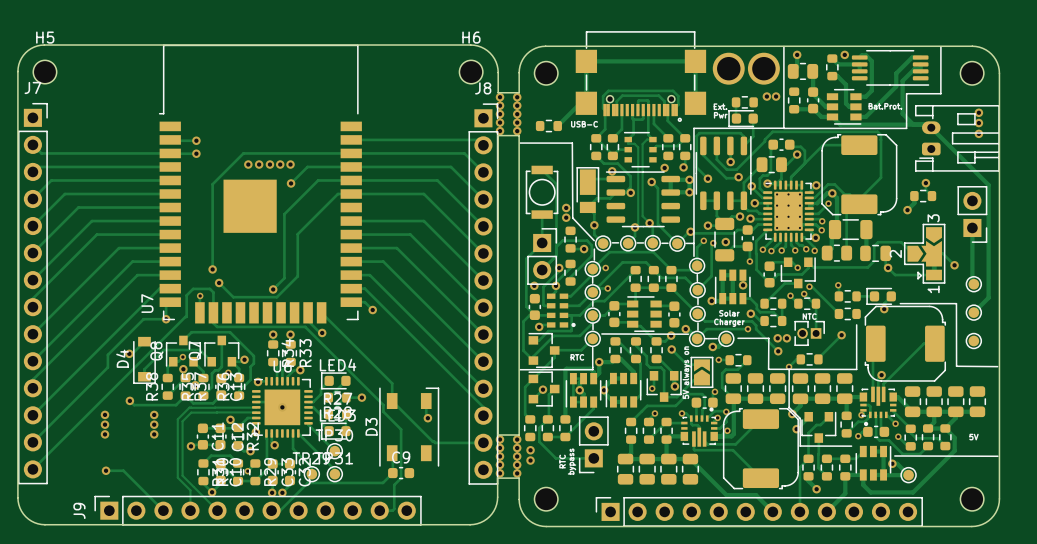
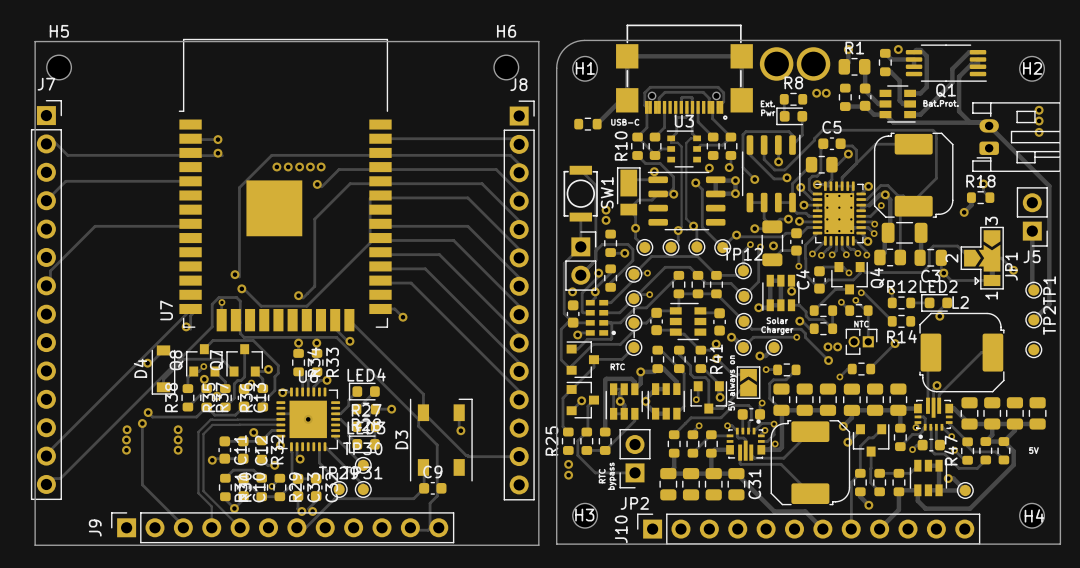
line: (783, 46) (783, 128) (906, 128) (906, 93) (940, 93) (940, 47) -> none
board edge: (972, 46) (982, 48) (991, 54) (997, 62) (999, 73) (999, 498) (995, 512) (982, 524) (971, 526) (542, 526) (529, 520) (521, 509) (519, 478) (497, 478) (497, 500) (493, 510) (483, 521) (473, 524) (44, 524) (31, 521) (23, 514) (17, 497) (17, 71) (21, 58) (28, 50) (44, 45) (474, 45) (487, 50) (494, 58) (497, 68) (498, 92) (519, 92) -> (1032, 40) (1060, 40) (1060, 544) (556, 544) (556, 89)
board edge: none -> (35, 41) (35, 545) (538, 545) (538, 41) (35, 41)
R1 name: none -> R1 (854, 47)
H1 name: none -> H1 (585, 68)
H2 name: none -> H2 (1032, 68)
R8 name: none -> R8 (793, 82)
Q1 name: none -> Q1 (946, 90)
via: (500, 97) -> none
via: (517, 97) -> none
via: (500, 105) -> none
via: (517, 105) -> none
via: (500, 114) -> none
via: (517, 114) -> none
via: (500, 122) -> none
via: (517, 122) -> none
U3 name: none -> U3 (684, 121)
line: (784, 128) (693, 128) (693, 256) -> none
C5 name: none -> C5 (831, 127)
via: (500, 131) -> none
via: (517, 131) -> none
board edge: (498, 135) (498, 435) (519, 435) (519, 135) (498, 135) -> none
track: none -> (50, 138) (67, 155) (222, 155)
line: (520, 143) (572, 143) (572, 218) (594, 240) -> none
track: (32, 144) (41, 153) (196, 153) -> none
R10 name: none -> R10 (621, 146)
via: (248, 164) -> none
via: (259, 164) -> none
via: (269, 164) -> none
via: (280, 164) -> none
via: (290, 164) -> none
track: (170, 166) (37, 166) (32, 171) -> none
via: none -> (276, 166)
via: none -> (288, 166)
via: none -> (299, 166)
via: none -> (310, 166)
via: none -> (321, 166)
track: none -> (523, 168) (510, 155) (271, 155) (239, 187) (239, 277)
track: (483, 172) (464, 153) (243, 153) (212, 184) (212, 269) -> none
R18 name: none -> R18 (980, 181)
track: (291, 183) (307, 166) (450, 166) (483, 199) -> none
track: none -> (321, 186) (339, 169) (496, 169) (523, 196)
SW1 name: none -> SW1 (607, 192)
track: (170, 194) (64, 194) (32, 226) -> none
track: (170, 207) (78, 207) (32, 253) -> none
track: (170, 221) (91, 221) (32, 280) -> none
track: (351, 221) (423, 221) (483, 280) -> none
track: none -> (523, 224) (482, 183) (350, 183) (314, 219) (314, 286) (303, 298)
track: none -> (194, 226) (95, 226) (50, 270) (50, 279)
track: none -> (384, 226) (467, 226) (523, 281)
track: (483, 226) (437, 180) (318, 180) (284, 214) (284, 278) (273, 289) -> none
track: (170, 234) (96, 234) (32, 298) (32, 307) -> none
track: (351, 234) (410, 234) (483, 307) -> none
track: none -> (384, 240) (453, 240) (523, 310)
line: (612, 242) (618, 242) -> none
line: (637, 242) (643, 242) -> none
line: (661, 243) (668, 243) -> none
line: (686, 243) (693, 243) -> none
track: (170, 248) (119, 248) (32, 334) -> none
track: (351, 248) (396, 248) (483, 334) -> none
track: none -> (523, 253) (467, 197) (370, 197) (370, 242) (306, 306) (261, 306) (246, 291)
line: (594, 249) (594, 260) -> none
track: none -> (384, 254) (439, 254) (523, 338)
TP12 name: none -> TP12 (742, 254)
J5 name: none -> J5 (1032, 256)
track: (483, 253) (423, 194) (337, 194) (297, 234) (297, 276) (276, 297) (233, 297) (219, 282) -> none
track: (170, 261) (132, 261) (32, 361) -> none
track: (351, 261) (383, 261) (483, 361) -> none
JP1 name: none -> JP1 (1011, 266)
track: none -> (384, 268) (425, 268) (523, 366)
C3 name: none -> C3 (930, 276)
Q4 name: none -> Q4 (877, 277)
line: (697, 274) (697, 281) -> none
C4 name: none -> C4 (802, 279)
track: (170, 275) (137, 275) (32, 379) (32, 388) -> none
track: (351, 275) (369, 275) (483, 388) -> none
track: none -> (384, 283) (411, 283) (523, 395)
line: (592, 277) (592, 283) -> none
R12 name: none -> R12 (901, 286)
LED2 name: none -> LED2 (938, 286)
TP1 name: none -> TP1 (1049, 290)
track: (170, 288) (159, 288) (32, 415) -> none
track: (351, 288) (364, 288) (483, 407) (483, 415) -> none
L2 name: none -> L2 (960, 302)
line: (697, 298) (697, 304) -> none
track: (164, 302) (170, 302) (166, 306) (166, 319) (143, 319) (107, 354) (107, 367) (32, 442) -> none
line: (900, 303) (956, 303) (956, 366) (997, 366) -> none
TP2 name: none -> TP2 (1049, 320)
track: none -> (190, 329) (190, 315) (194, 311) (189, 311) (50, 450)
line: (697, 323) (697, 330) -> none
line: (856, 324) (856, 369) (768, 369) (768, 338) (738, 338) -> none
R14 name: none -> R14 (902, 336)
line: (601, 333) (688, 334) -> none
line: (705, 338) (717, 338) -> none
line: (592, 347) (592, 367) -> none
R41 name: none -> R41 (716, 359)
line: (592, 367) (592, 369) (519, 369) -> none
line: (789, 369) (789, 407) (800, 418) (800, 446) -> none
track: none -> (142, 423) (142, 484) (187, 530)
via: none -> (142, 423)
via: (105, 414) -> none
via: (154, 414) -> none
via: none -> (127, 429)
via: none -> (178, 429)
via: (105, 424) -> none
via: (154, 424) -> none
via: none -> (126, 439)
via: none -> (178, 439)
R25 name: none -> R25 (551, 440)
via: (105, 434) -> none
via: (154, 434) -> none
via: none -> (126, 450)
via: none -> (178, 450)
R47 name: none -> R47 (950, 450)
via: (499, 439) -> none
via: (517, 439) -> none
line: (800, 446) (851, 446) -> none
via: (499, 447) -> none
via: (517, 448) -> none
line: (894, 455) (997, 456) -> none
via: (499, 456) -> none
via: (517, 456) -> none
track: none -> (50, 478) (60, 478) (212, 326) (212, 304) (219, 297) (236, 297) (240, 301) (240, 333) (244, 337) (336, 337) (418, 419) (418, 426) (437, 445) (437, 496) (430, 503) (430, 528) (428, 530) (414, 530)
via: (499, 464) -> none
via: (517, 464) -> none
track: (32, 469) (186, 316) (186, 295) (193, 288) (209, 288) (213, 292) (213, 323) (217, 326) (305, 326) (383, 405) (383, 411) (401, 429) (401, 478) (394, 485) (394, 508) (392, 510) (379, 510) -> none
C31 name: none -> C31 (754, 484)
track: (106, 470) (123, 470) (163, 510) -> none
via: (106, 470) -> none
via: (499, 473) -> none
via: (517, 473) -> none
JP2 name: none -> JP2 (634, 503)
via: (272, 492) -> none
via: (282, 492) -> none
via: none -> (301, 511)
via: none -> (312, 511)
H3 name: none -> H3 (584, 515)
H4 name: none -> H4 (1034, 515)
J10 name: none -> J10 (621, 529)

